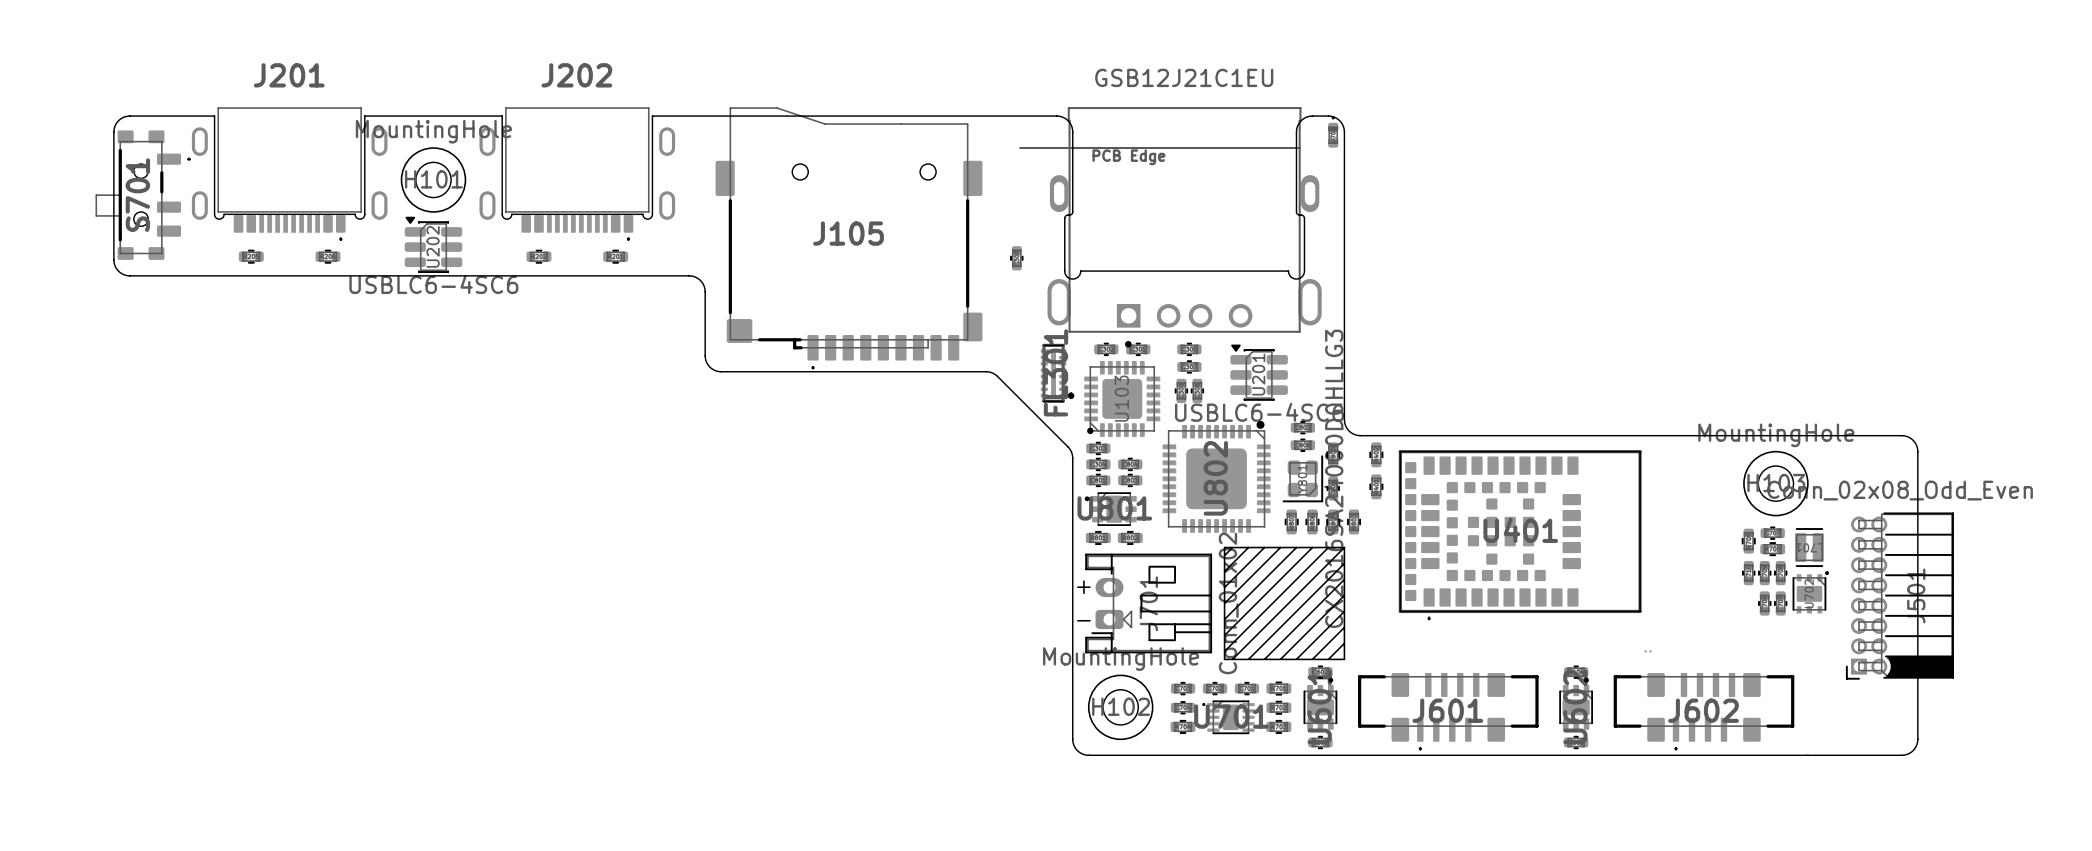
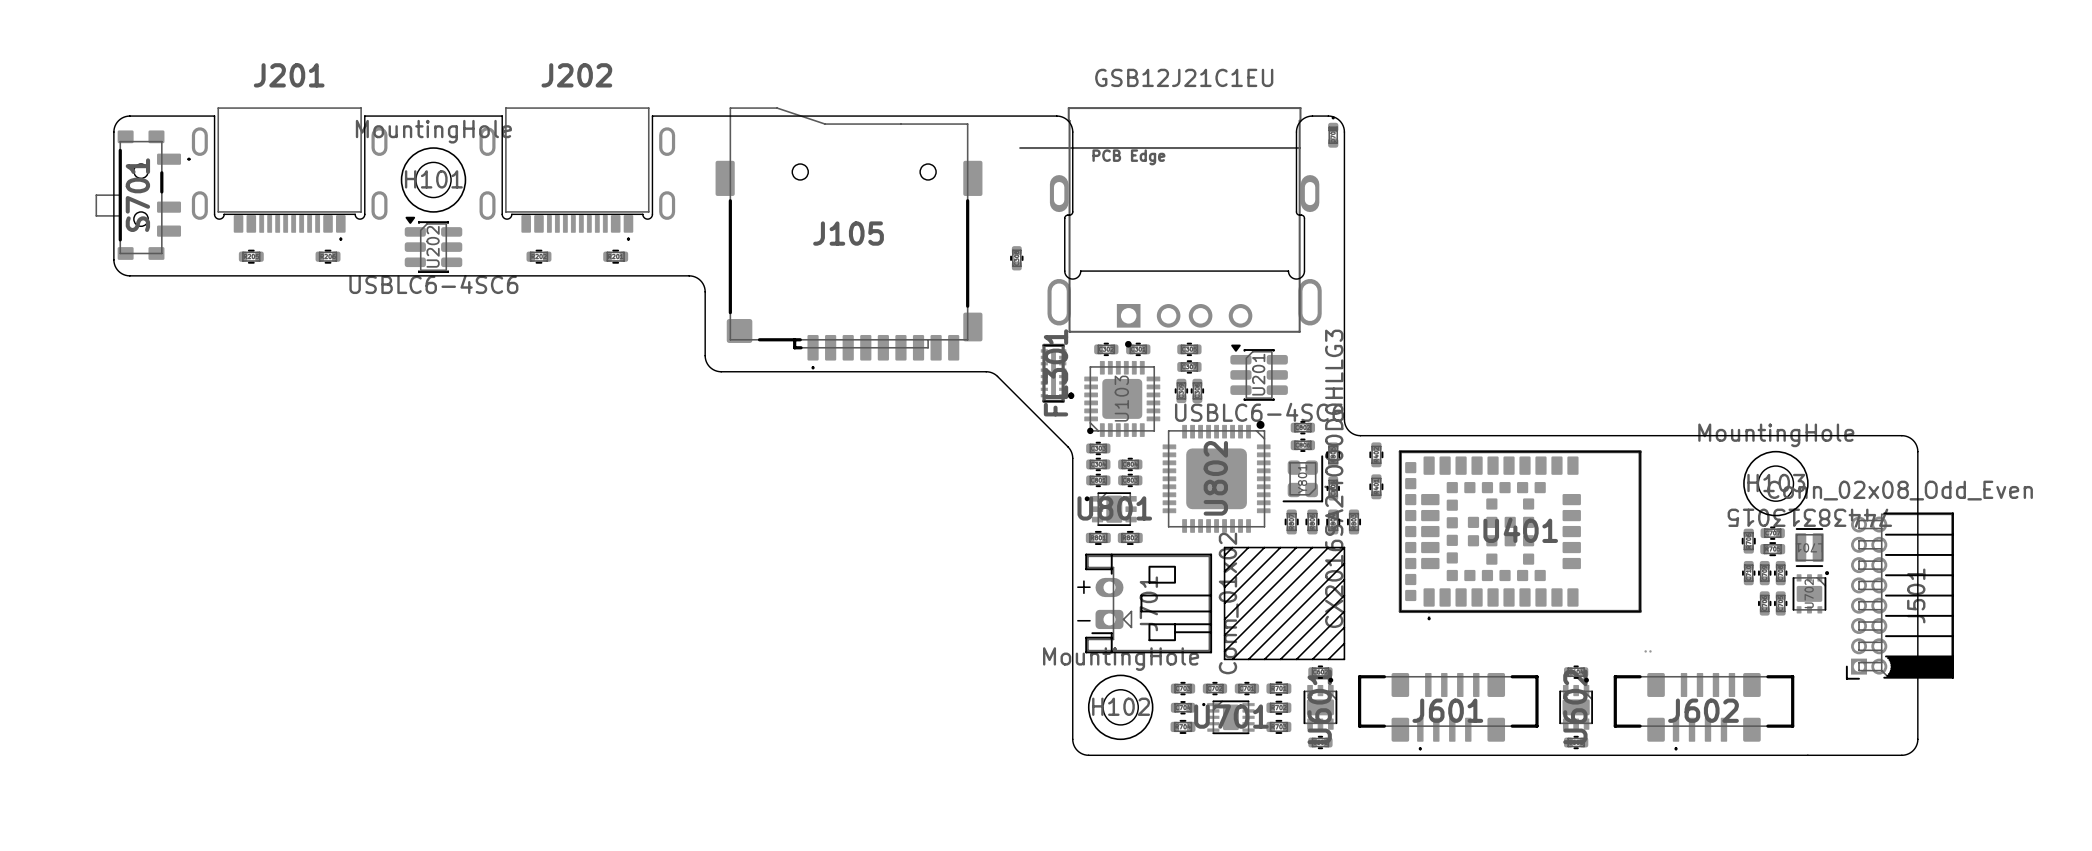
part value: none -> 74438313015 (1809, 518)

